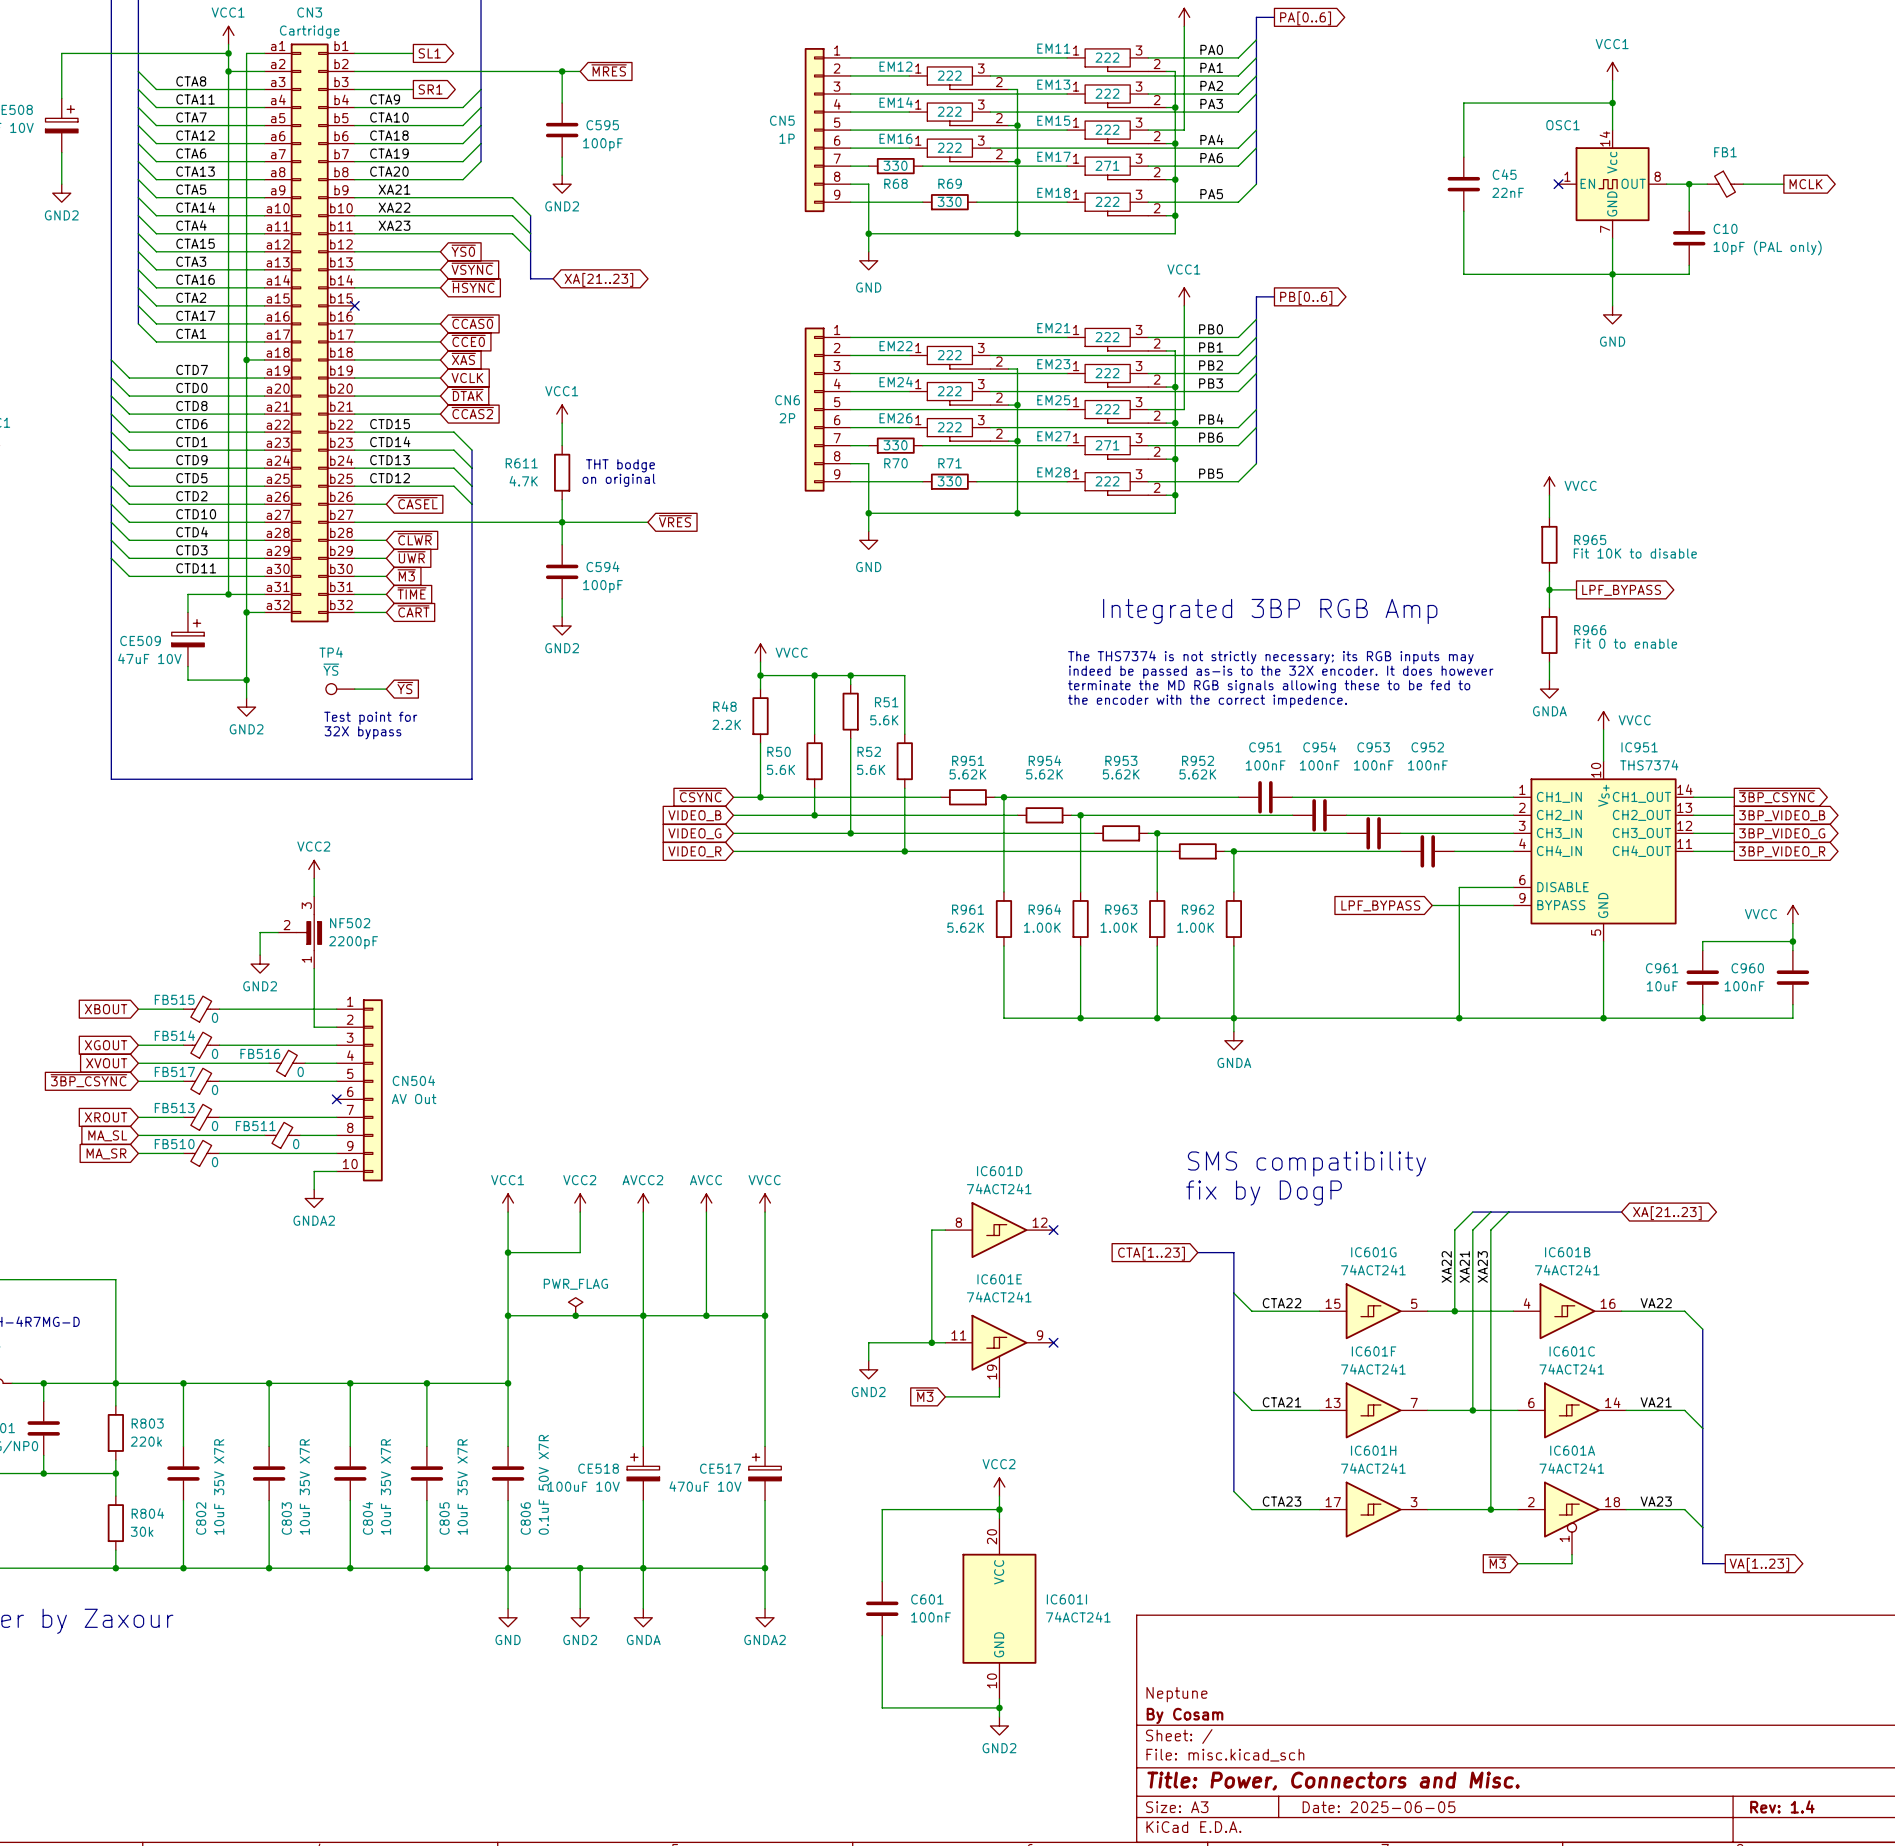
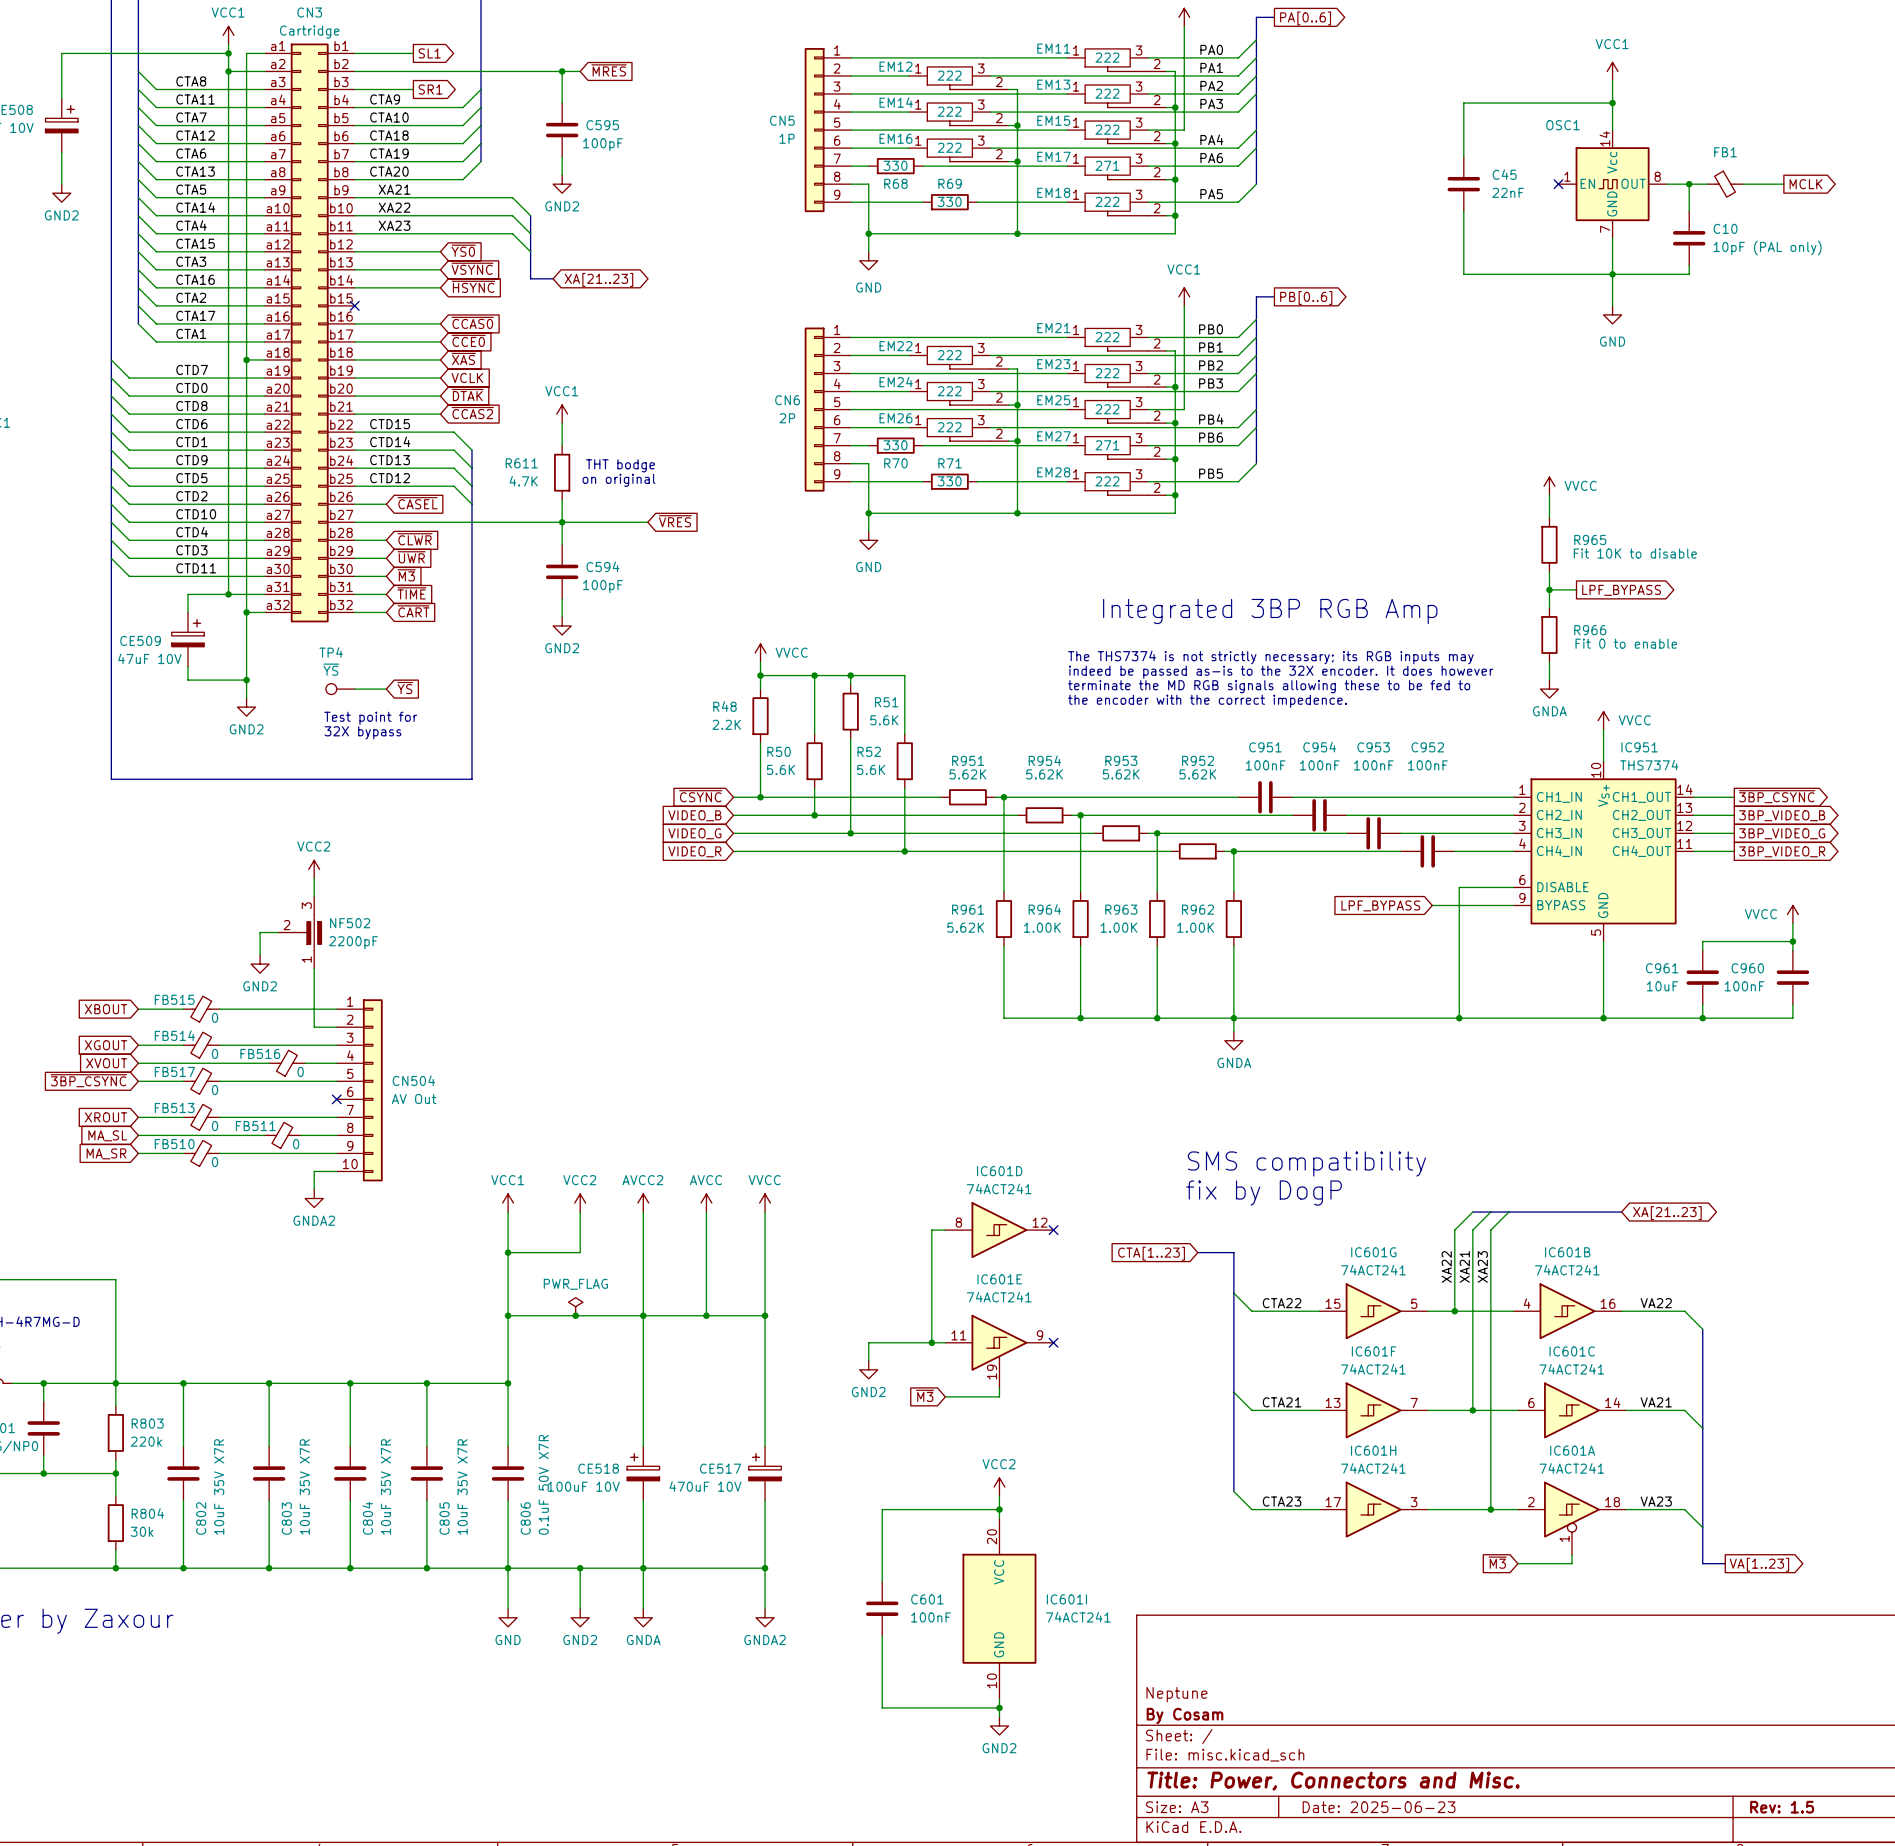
title block: Rev: 1.4 (1782, 1806) -> Rev: 1.5 (1782, 1807)
title block: Date: 2025-06-05 (1379, 1807) -> Date: 2025-06-23 (1379, 1807)

